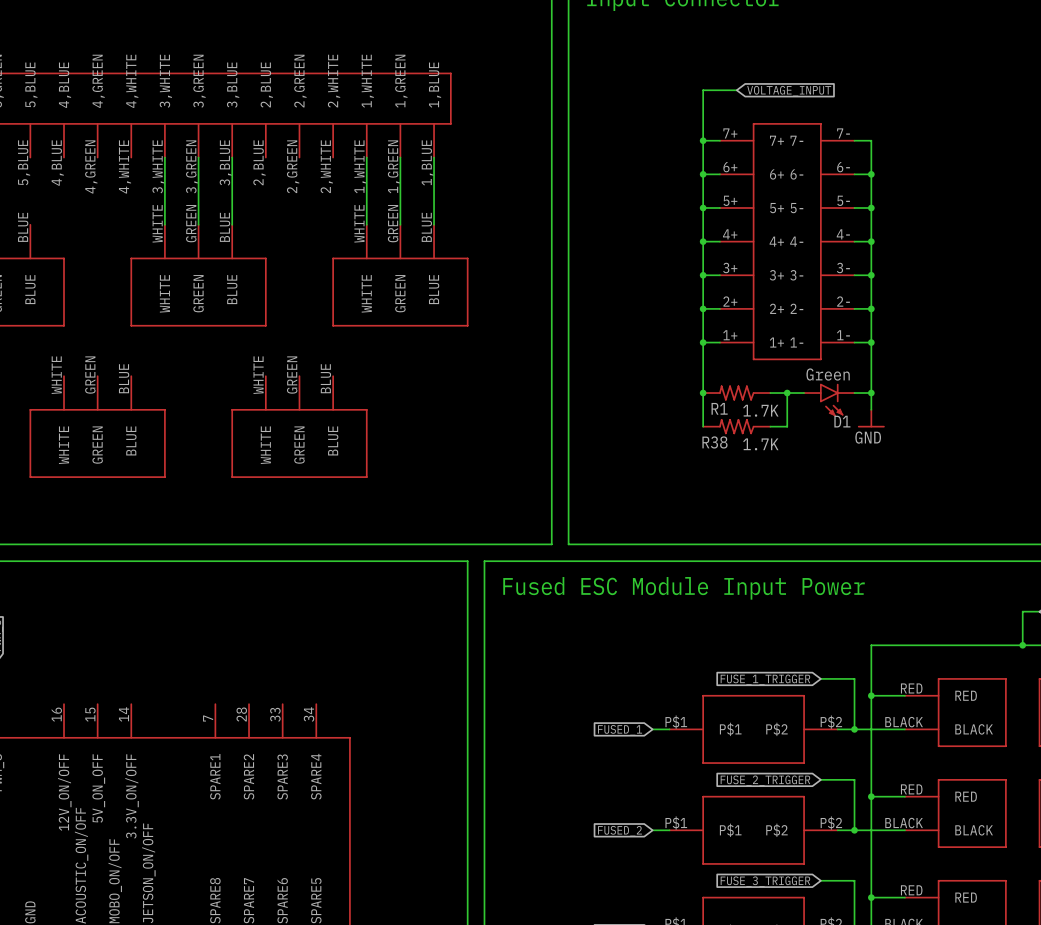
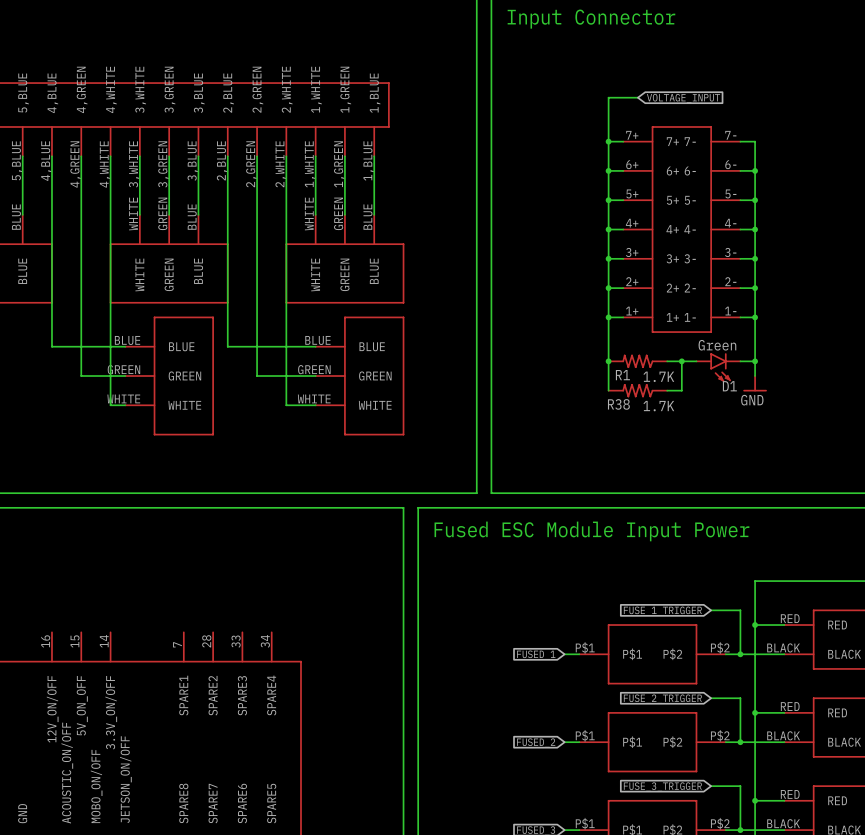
wire: none -> (22, 156) (22, 214)
wire: none -> (51, 156) (51, 346) (125, 346)
wire: none -> (81, 156) (81, 376) (125, 376)
wire: none -> (110, 156) (110, 405) (125, 405)
wire: none -> (227, 156) (227, 346) (315, 346)
wire: none -> (257, 156) (257, 376) (315, 376)
wire: none -> (286, 156) (286, 405) (315, 405)
part: none -> (169, 376)
part: none -> (359, 376)
part: (97, 426) -> none
part: (299, 426) -> none

